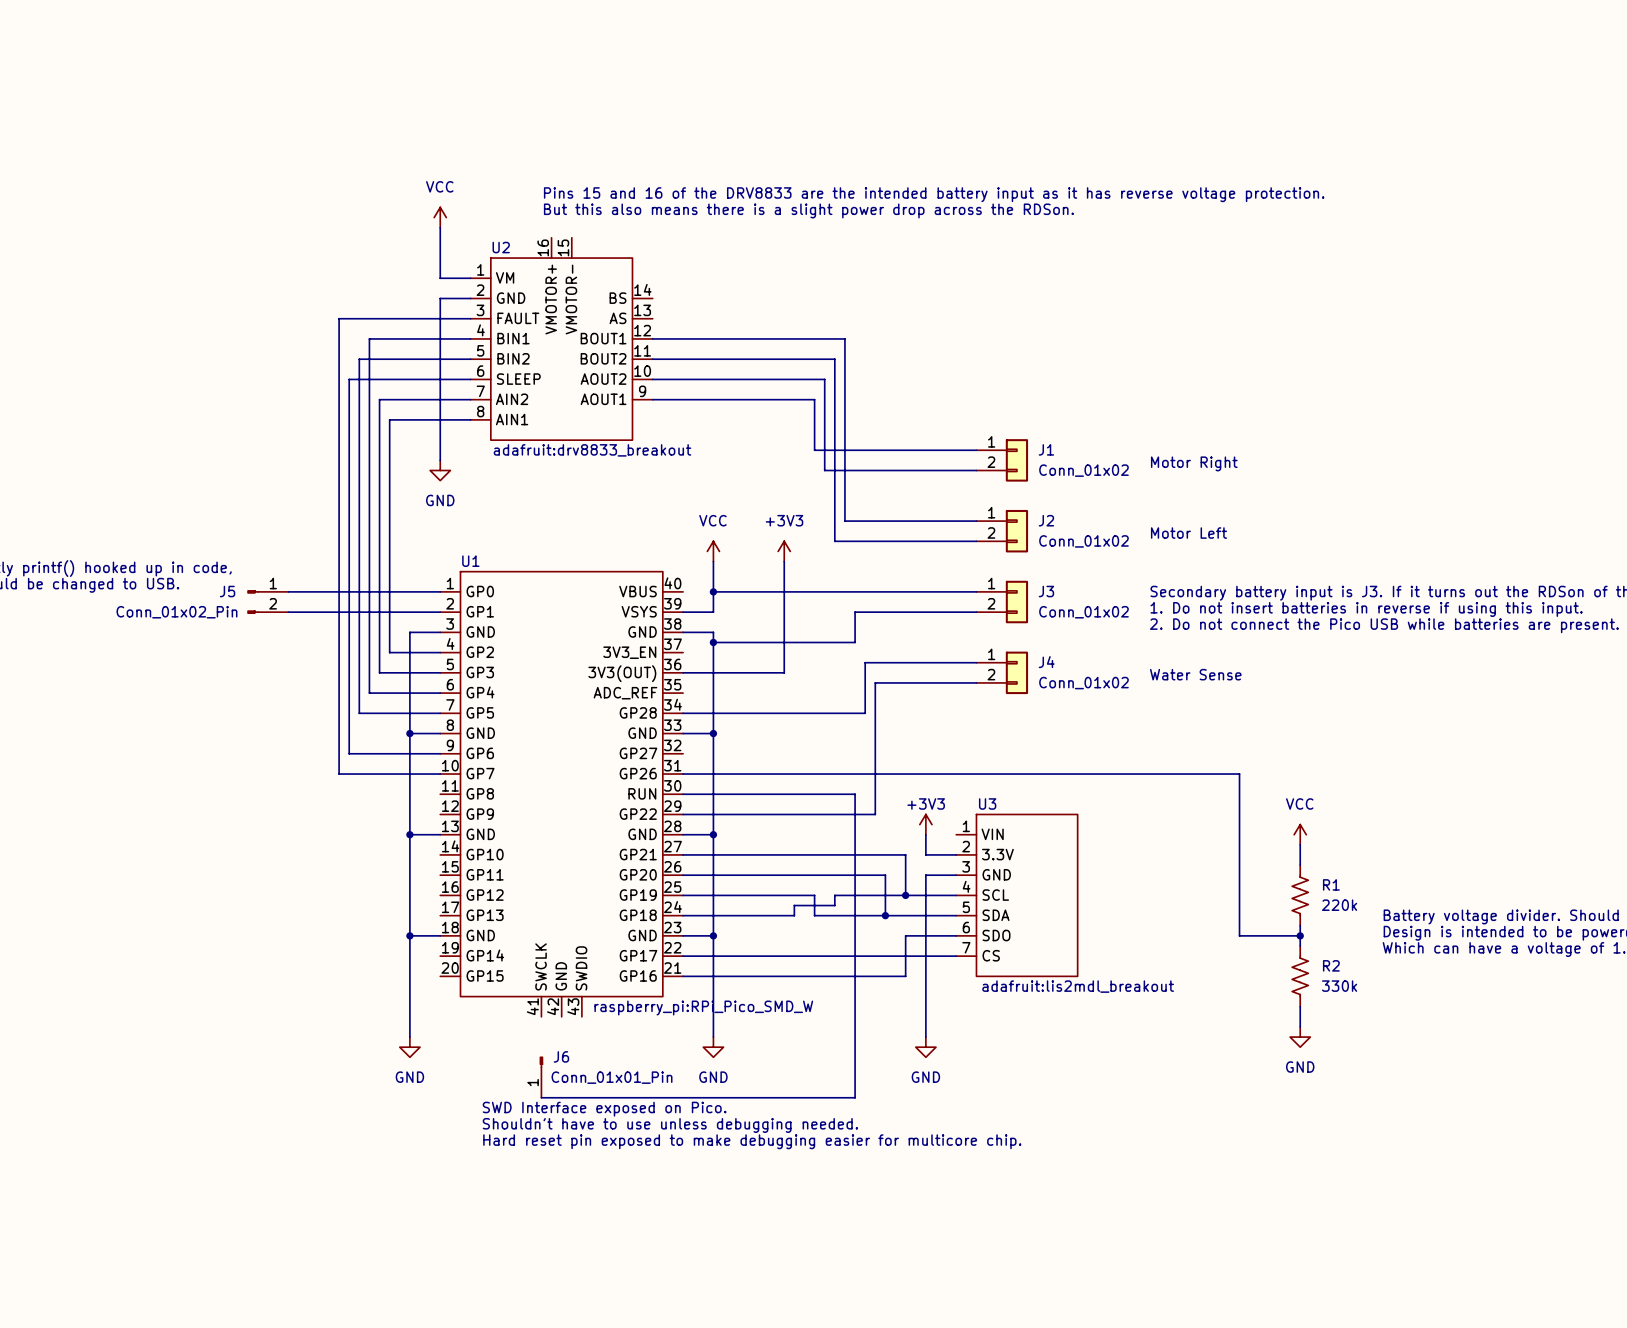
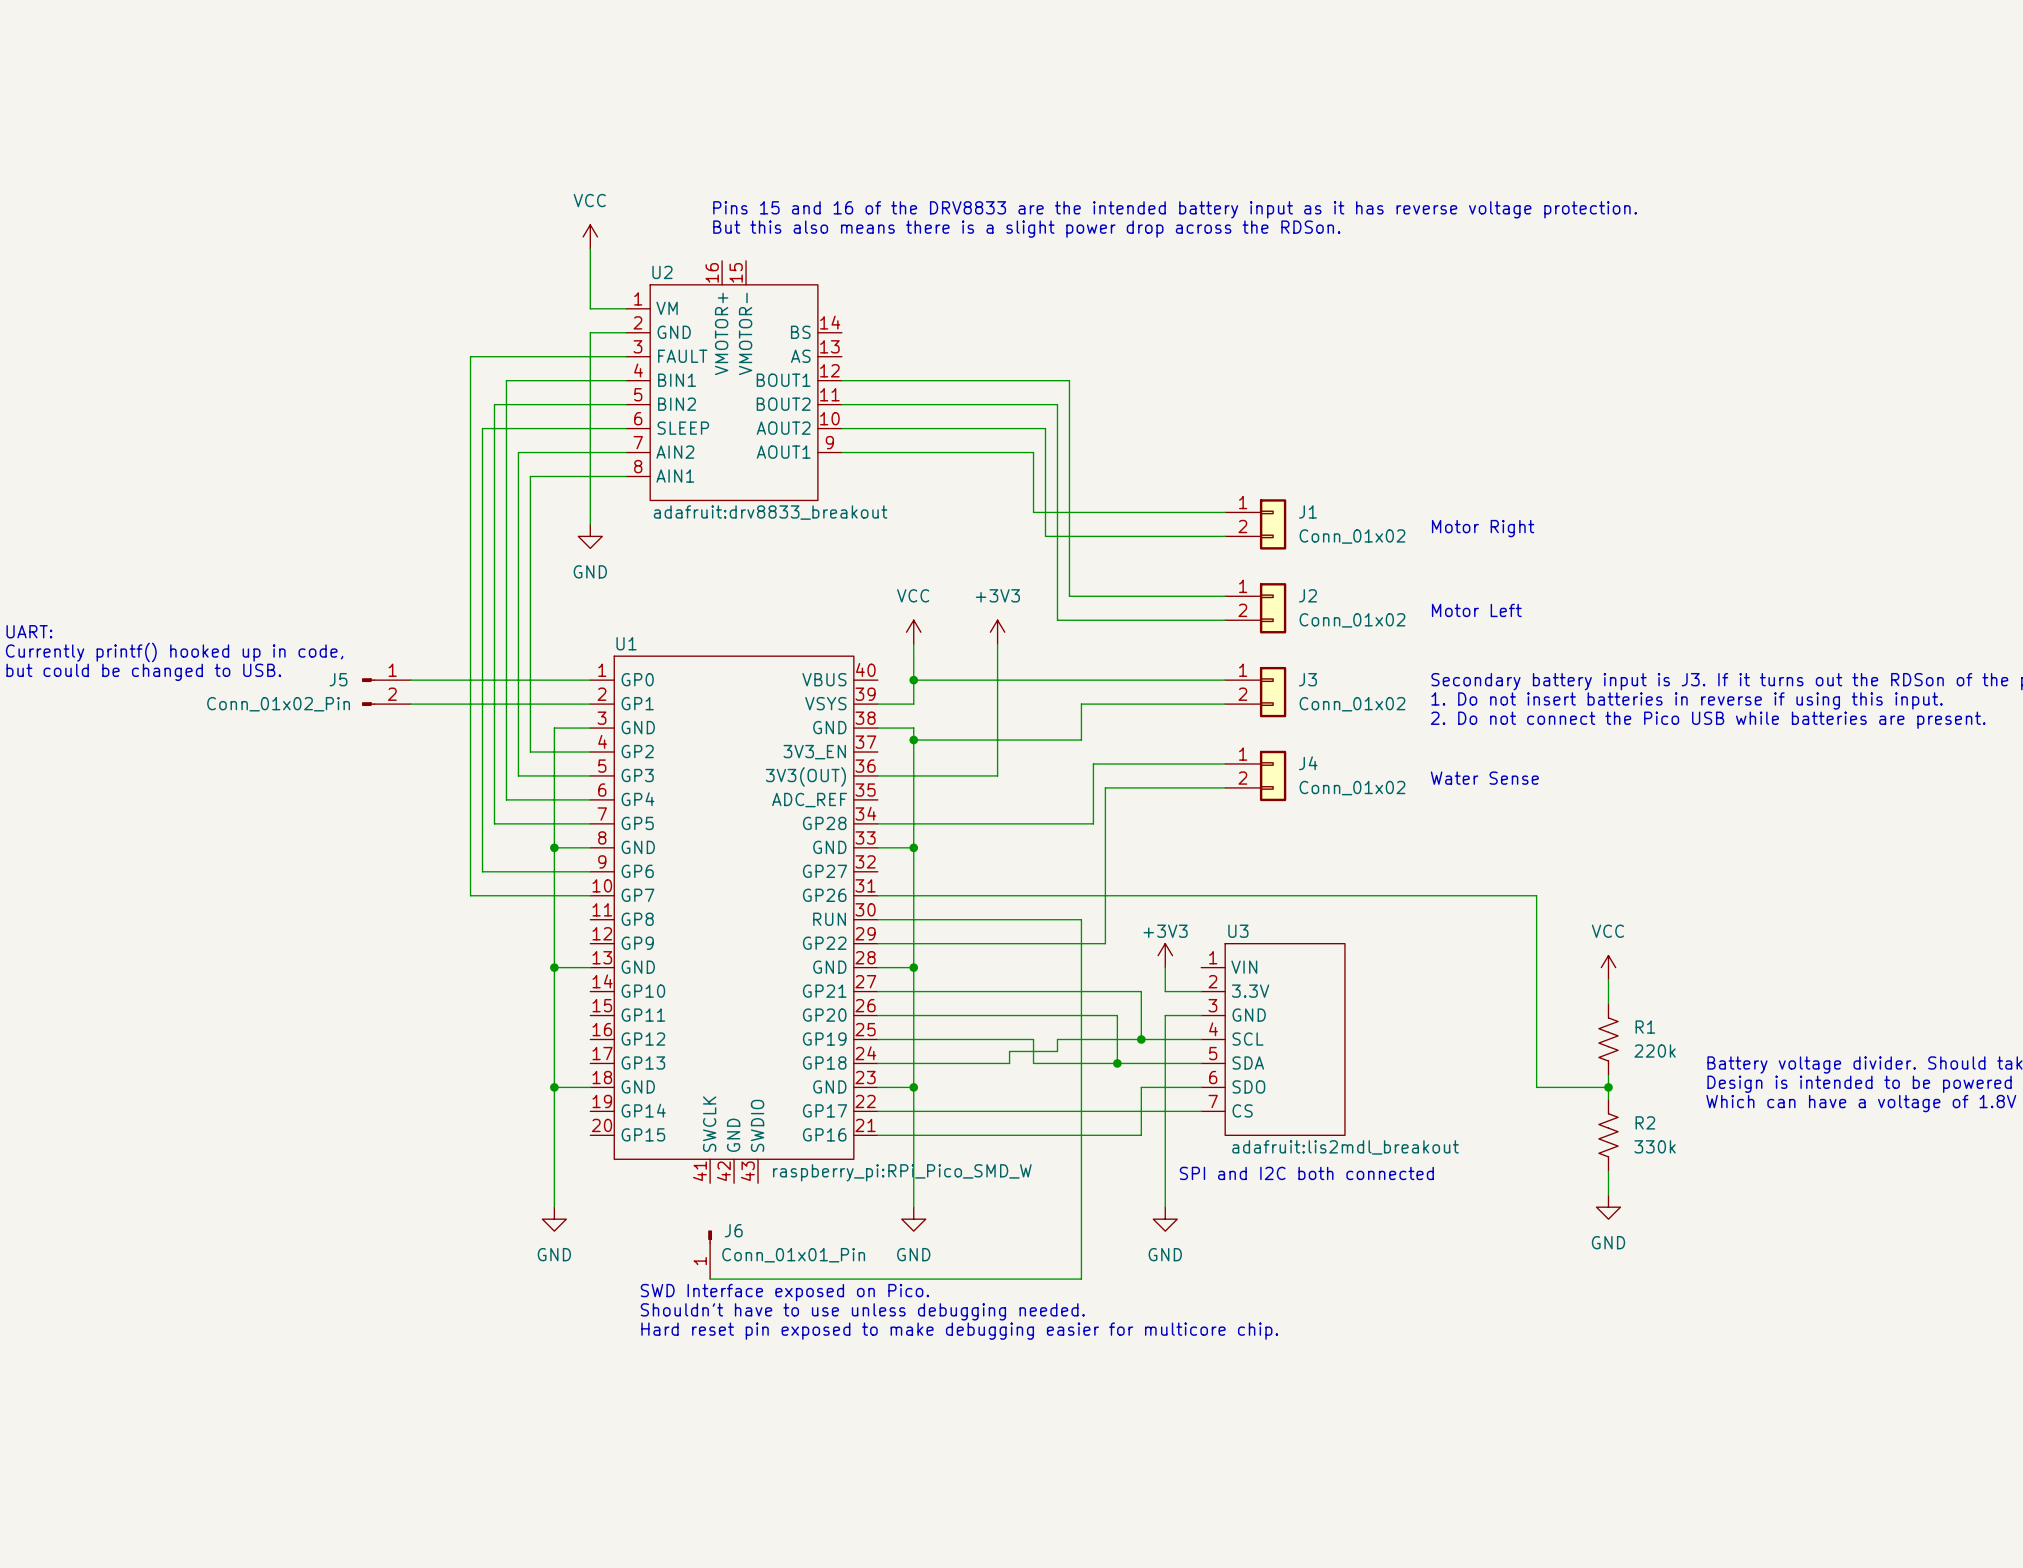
text: none -> SPI and I2C both connected (1306, 1173)

